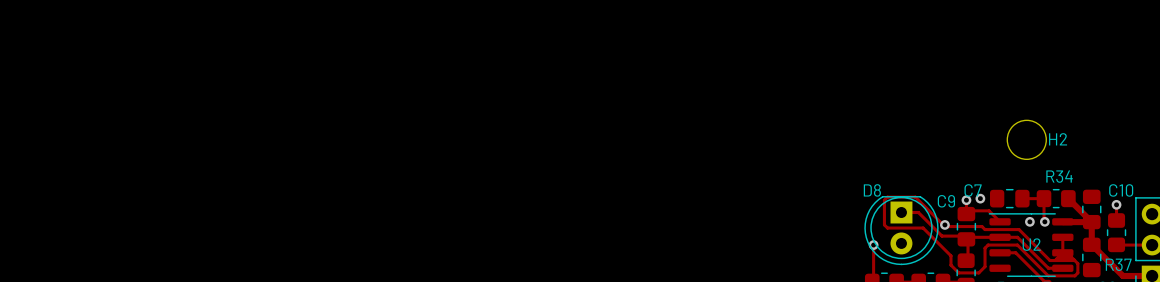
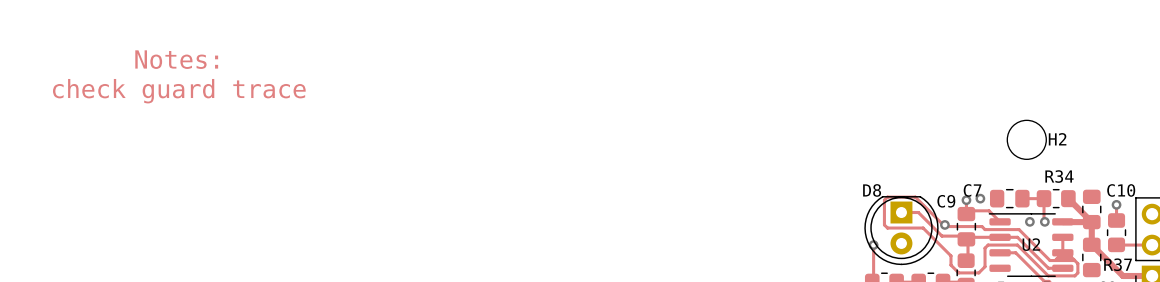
text: none -> Notes: (176, 59)
text: none -> check guard trace (179, 91)

